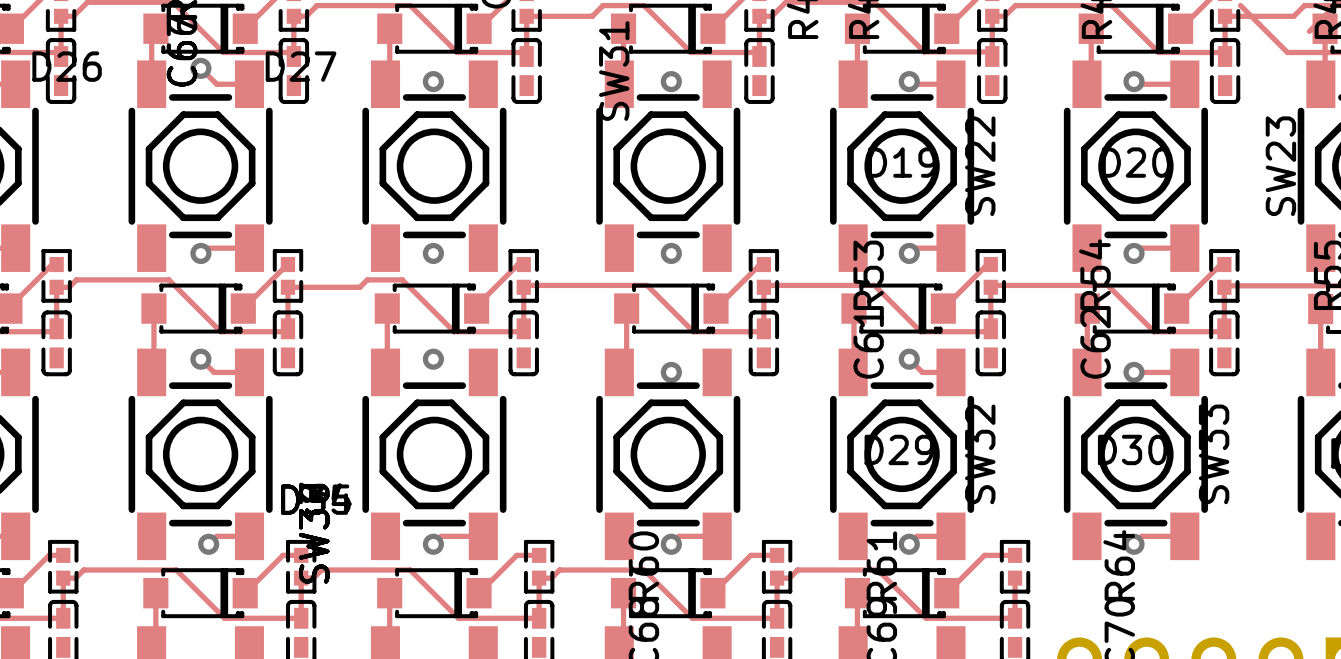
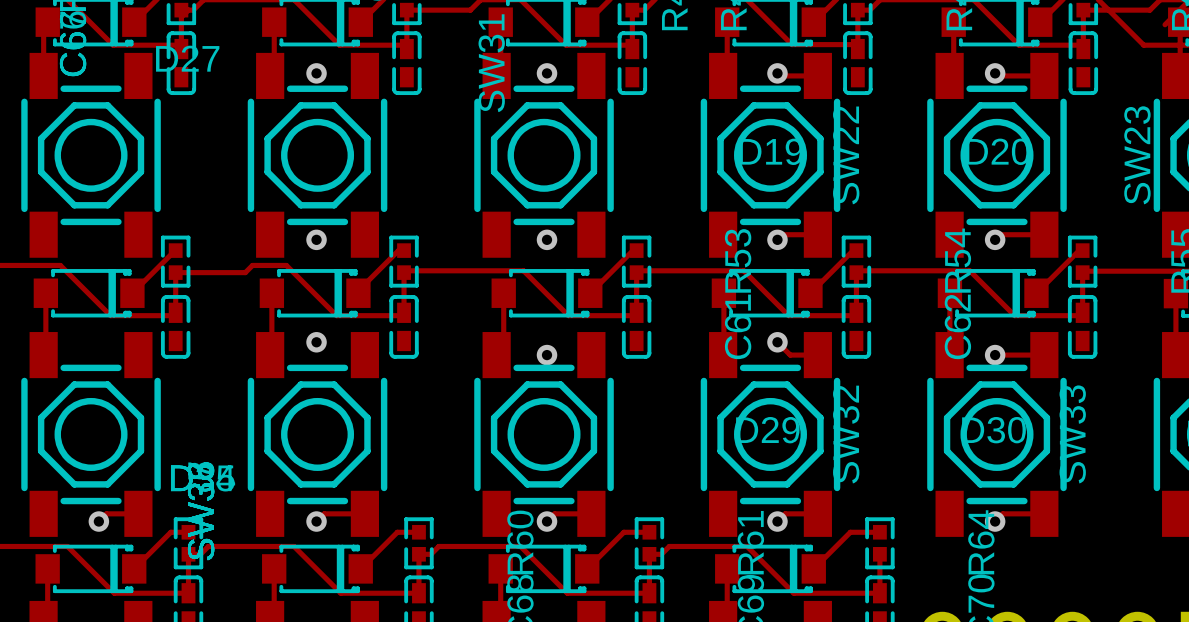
track: (200, 68) (216, 84) (249, 84) -> none
via: (200, 68) -> none
track: (249, 248) (206, 248) (200, 253) -> none
via: (200, 253) -> none
track: (200, 359) (214, 372) (249, 372) -> none
via: (200, 359) -> none

